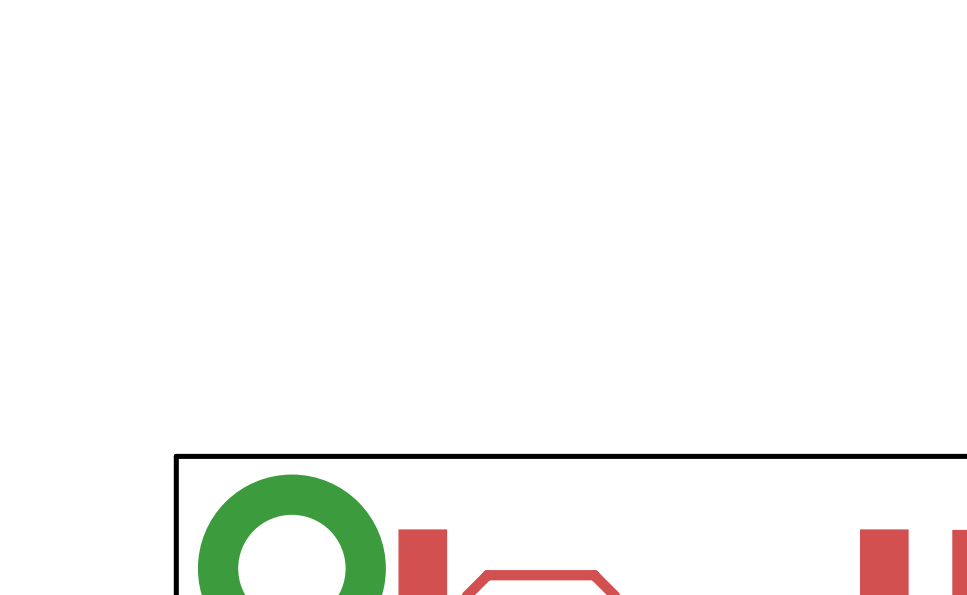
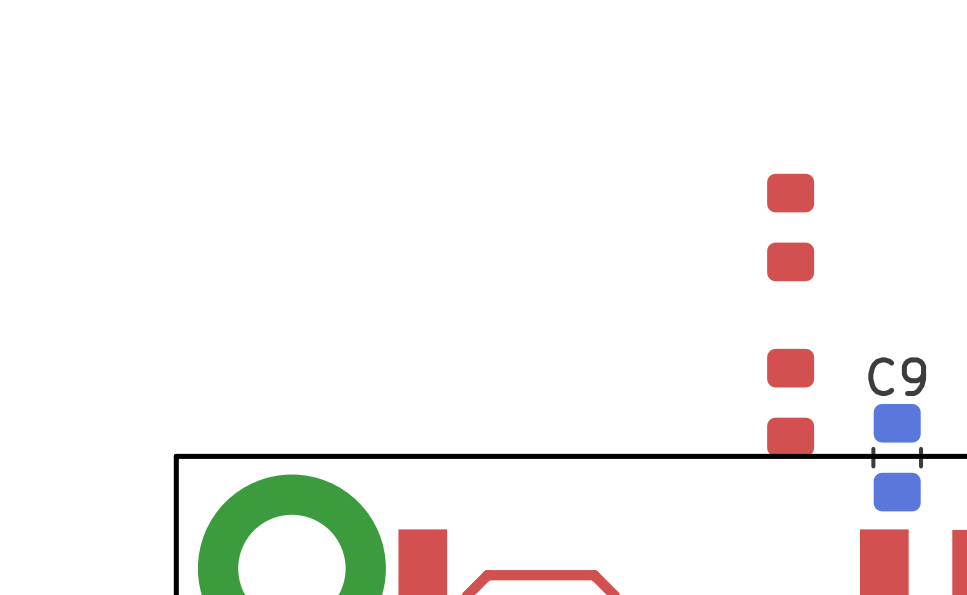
part: none -> (790, 227)
part: none -> (790, 402)
C9: none -> (897, 457)

